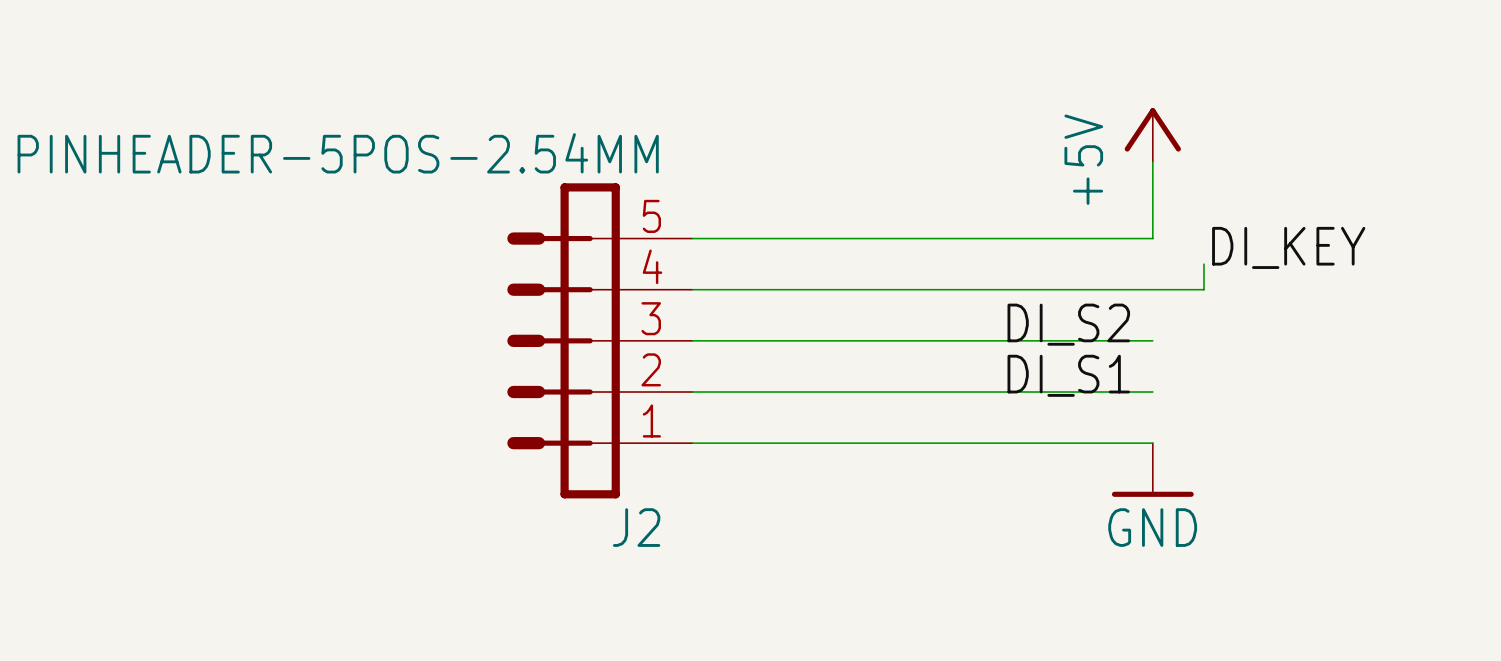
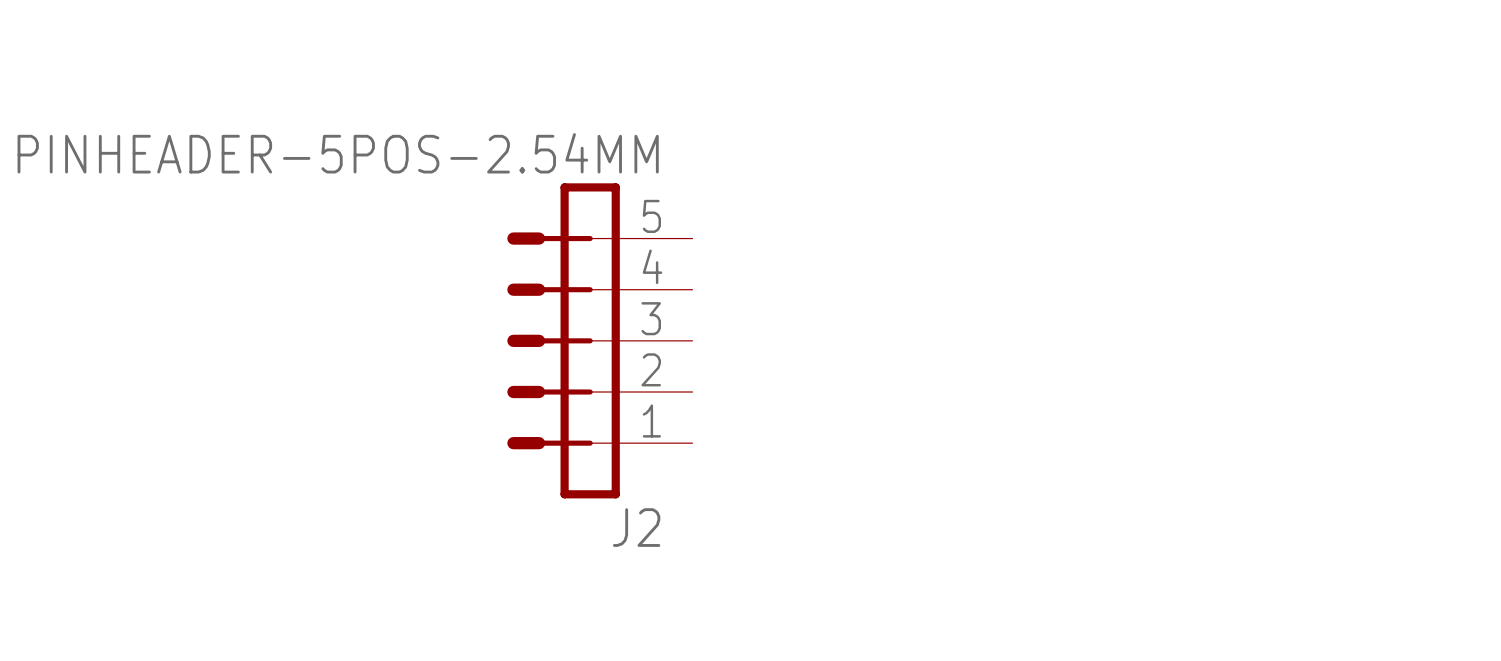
power symbol: +5V (1152, 134) -> none
wire: (1152, 161) (1152, 238) (692, 238) -> none
label: DI_KEY (1288, 247) -> none
wire: (1203, 264) (1203, 289) (692, 289) -> none
label: DI_S2 (1068, 324) -> none
wire: (692, 340) (1152, 340) -> none
label: DI_S1 (1068, 375) -> none
wire: (692, 392) (1152, 392) -> none
wire: (692, 443) (1152, 443) -> none
power symbol: GND (1152, 470) -> none

